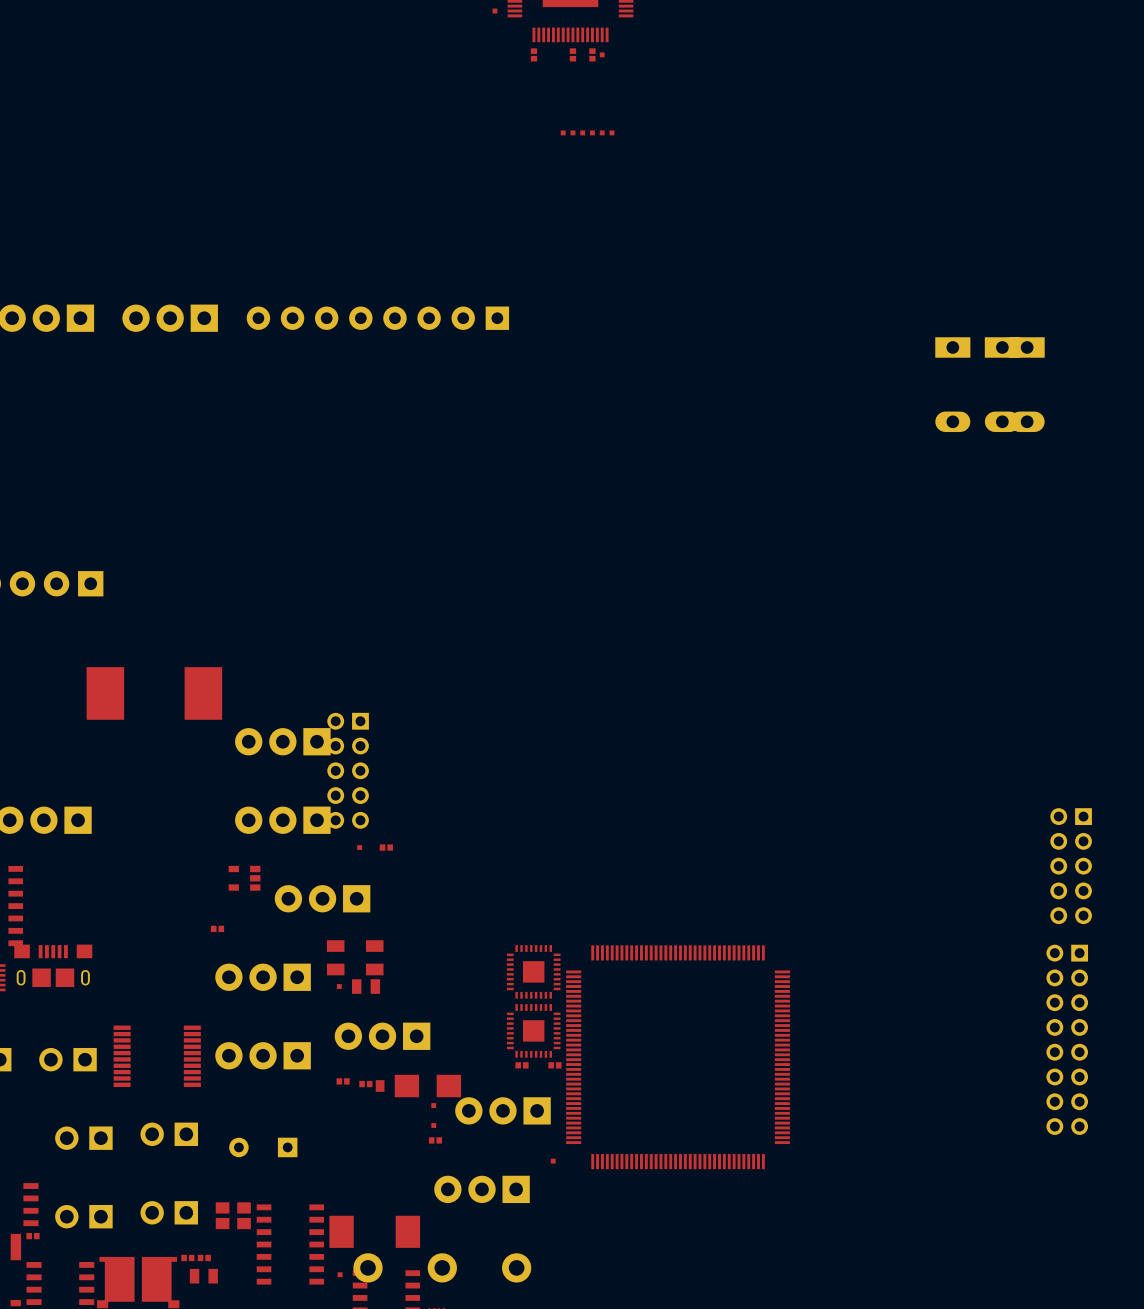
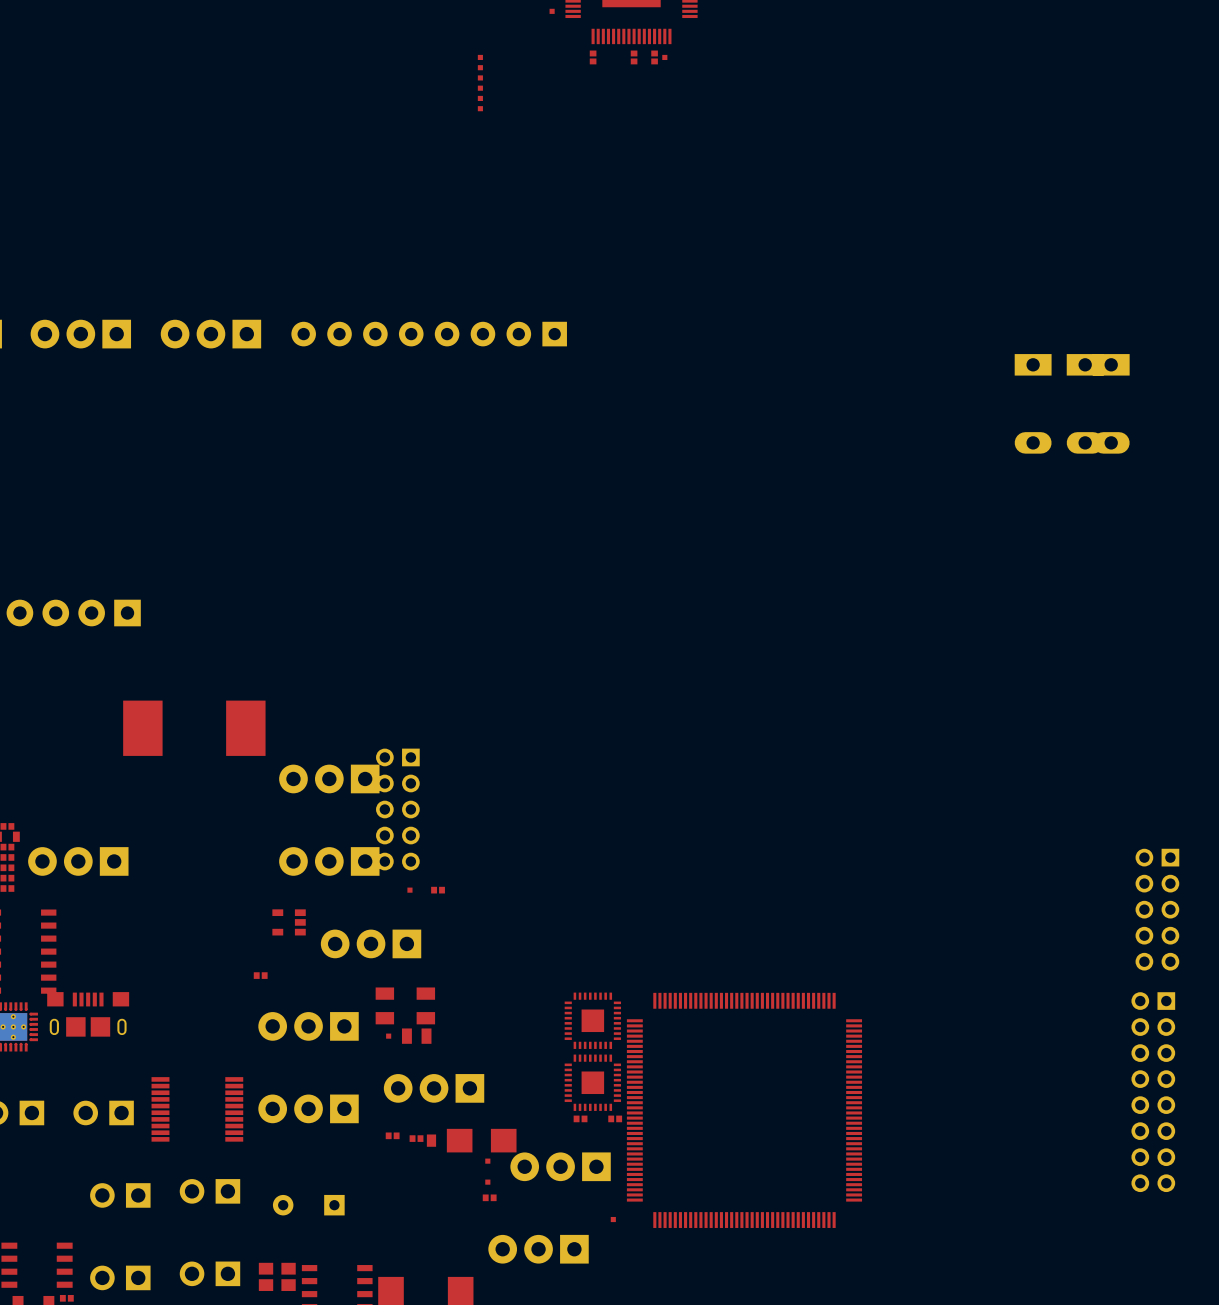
part: none -> (480, 57)
part: none -> (480, 67)
part: none -> (480, 77)
part: none -> (480, 88)
part: none -> (480, 98)
part: none -> (480, 108)
part: (563, 132) -> none
part: (572, 132) -> none
part: (582, 132) -> none
part: (592, 132) -> none
part: (602, 132) -> none
part: (611, 132) -> none

